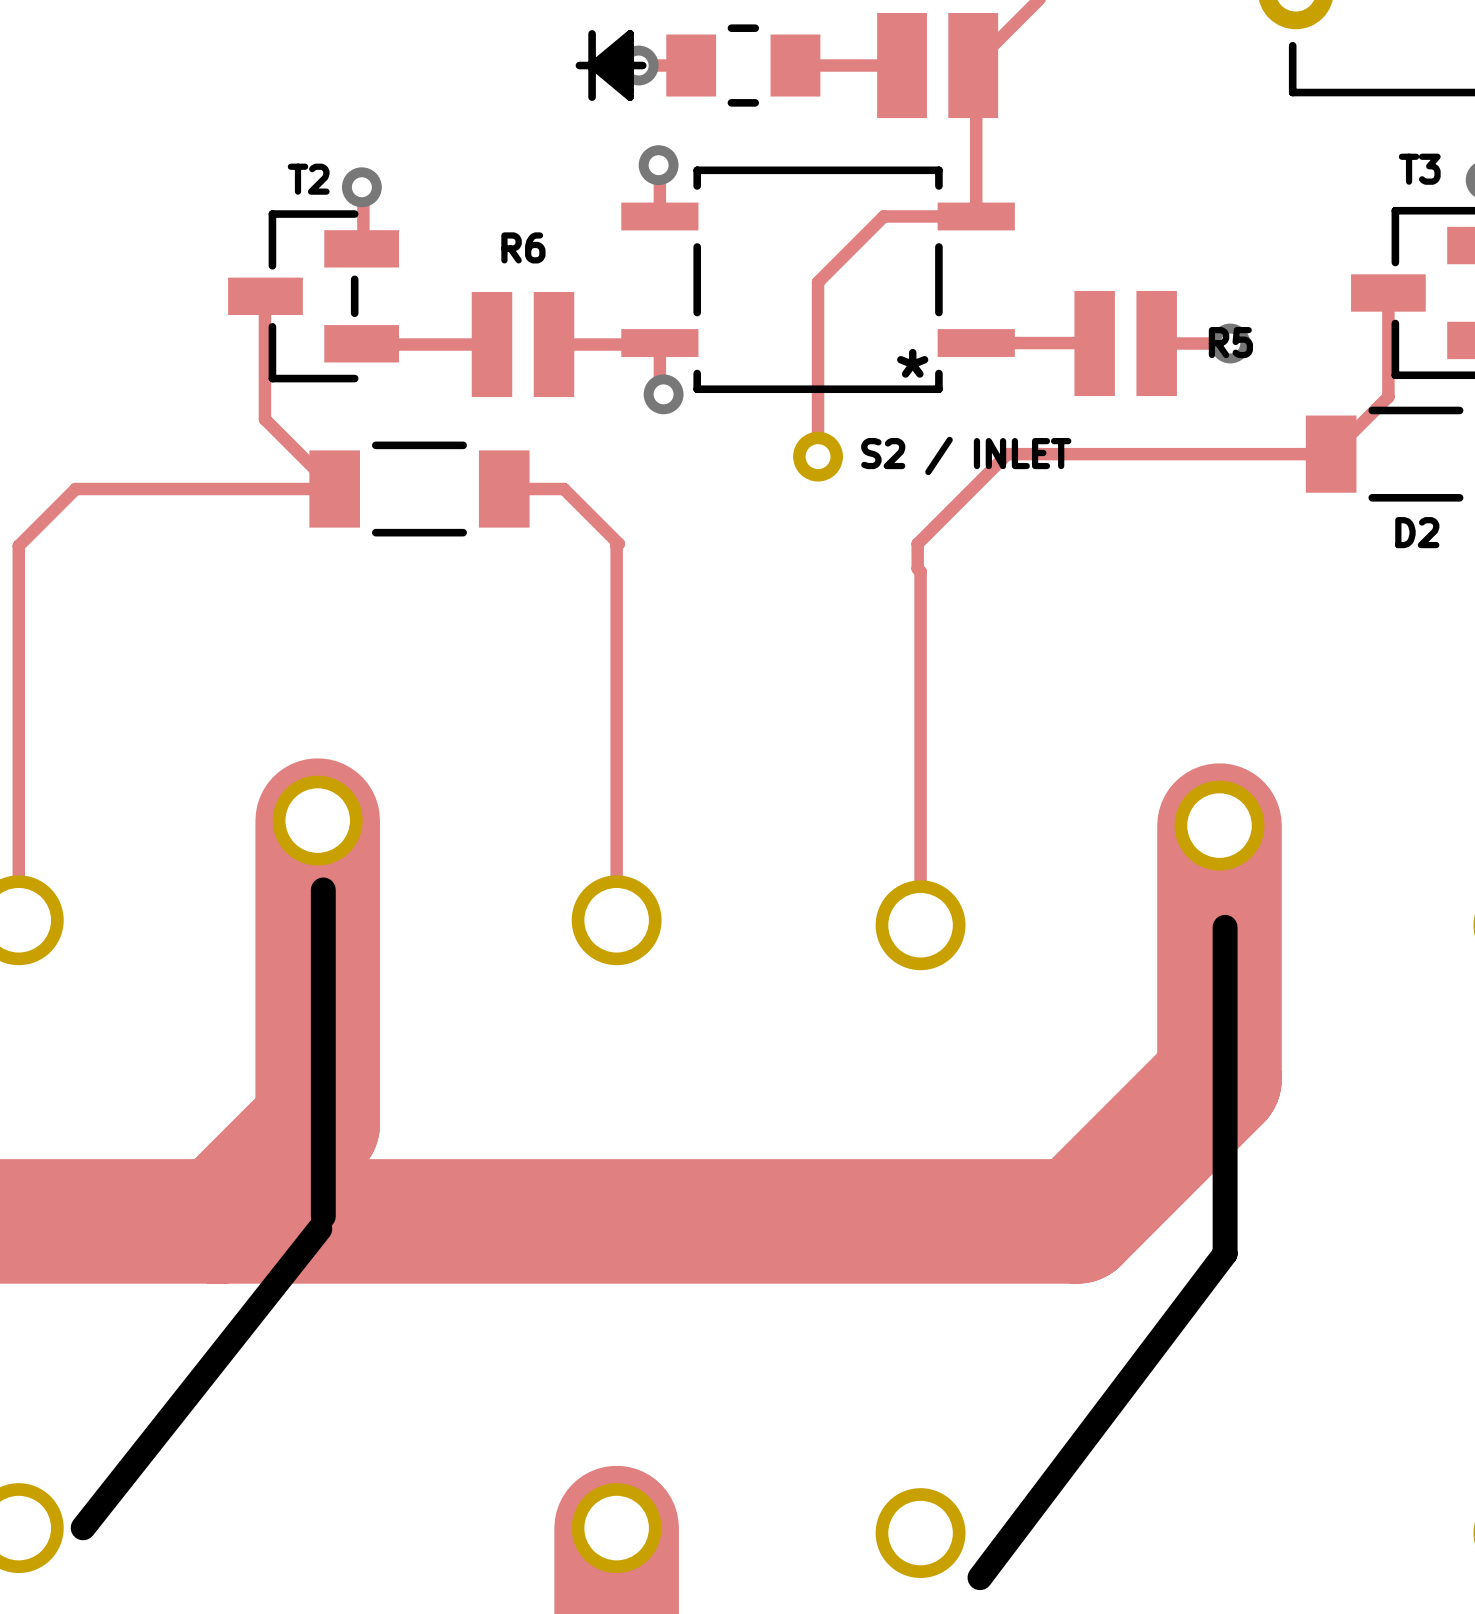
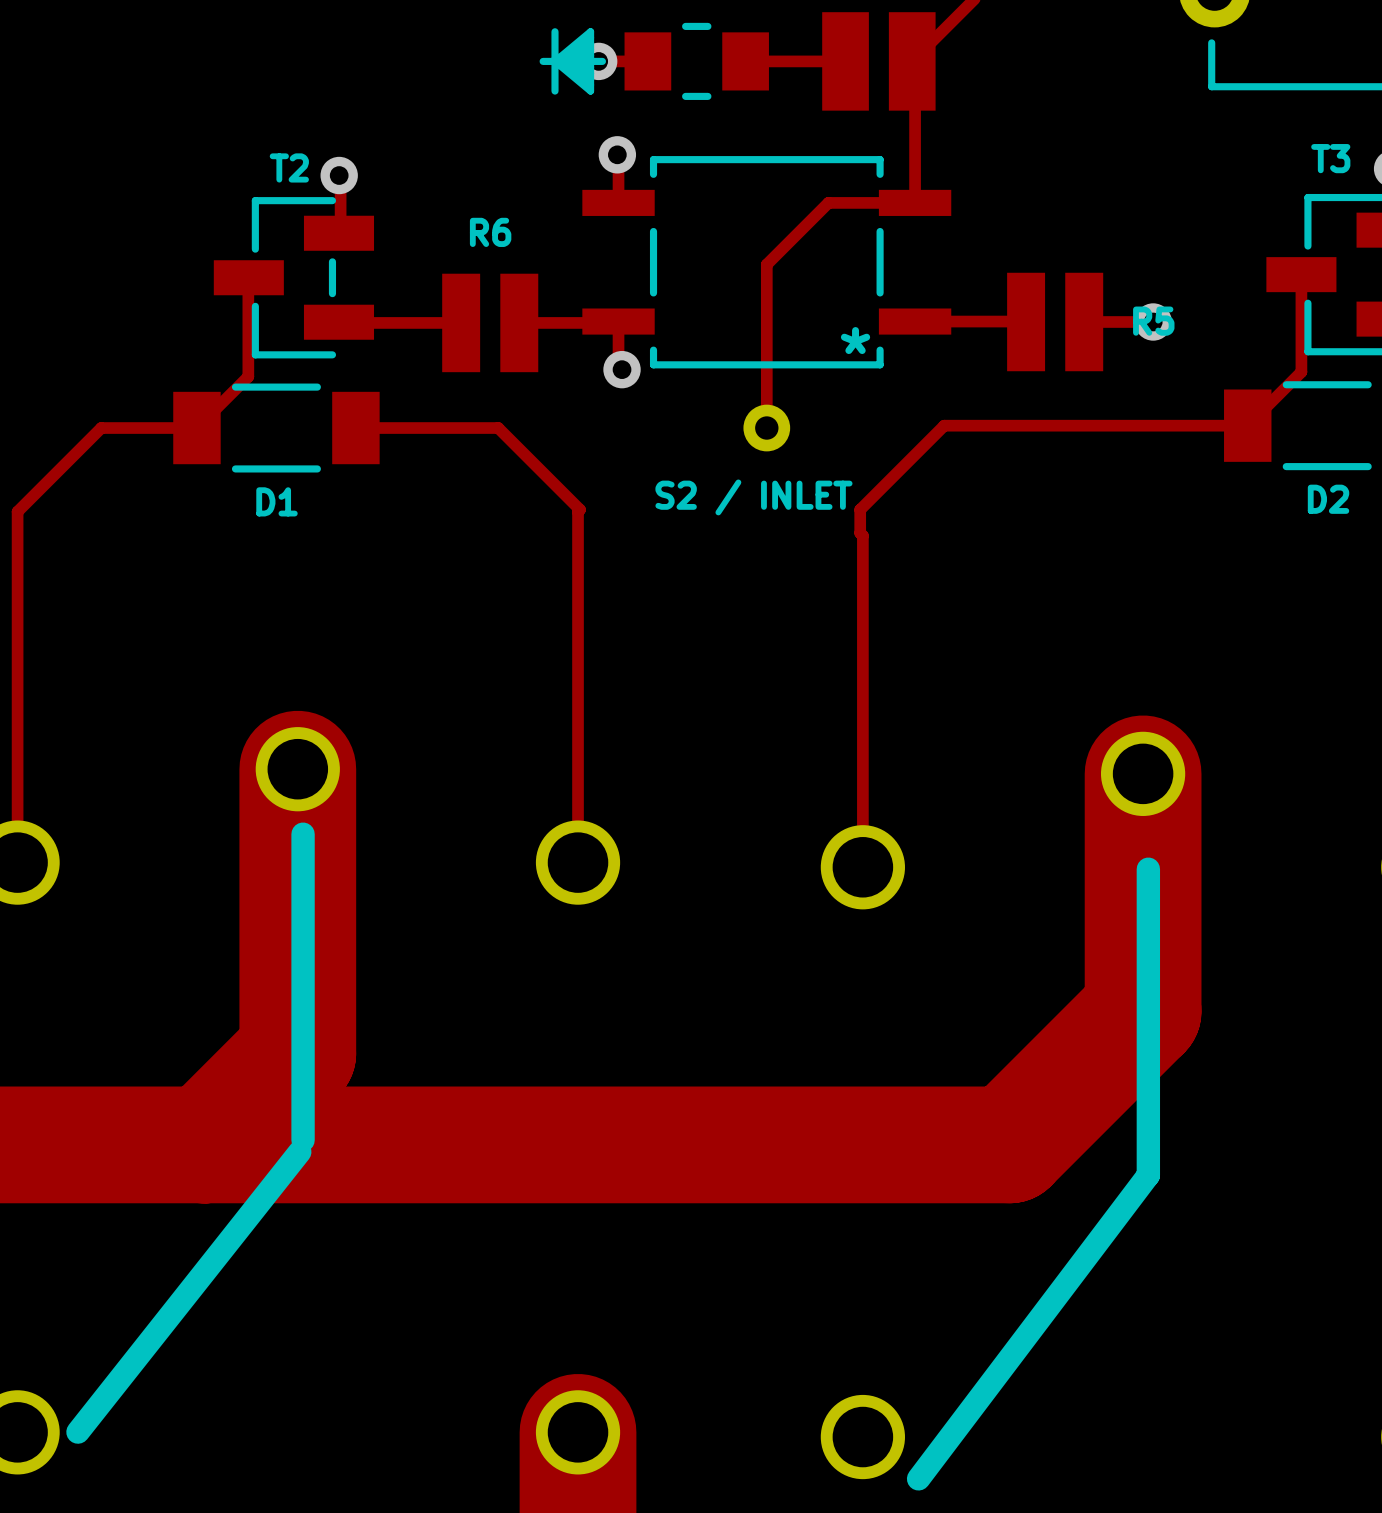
top track: (264, 401) (264, 419) (334, 489) (75, 489) -> (248, 376) (196, 428) (101, 428) (70, 458)
text position: S2 / INLET (966, 455) -> S2 / INLET (753, 497)
D1: none -> (276, 428)
part: (419, 489) -> none
top track: (504, 489) (563, 489) -> (355, 428) (498, 428) (528, 458)

